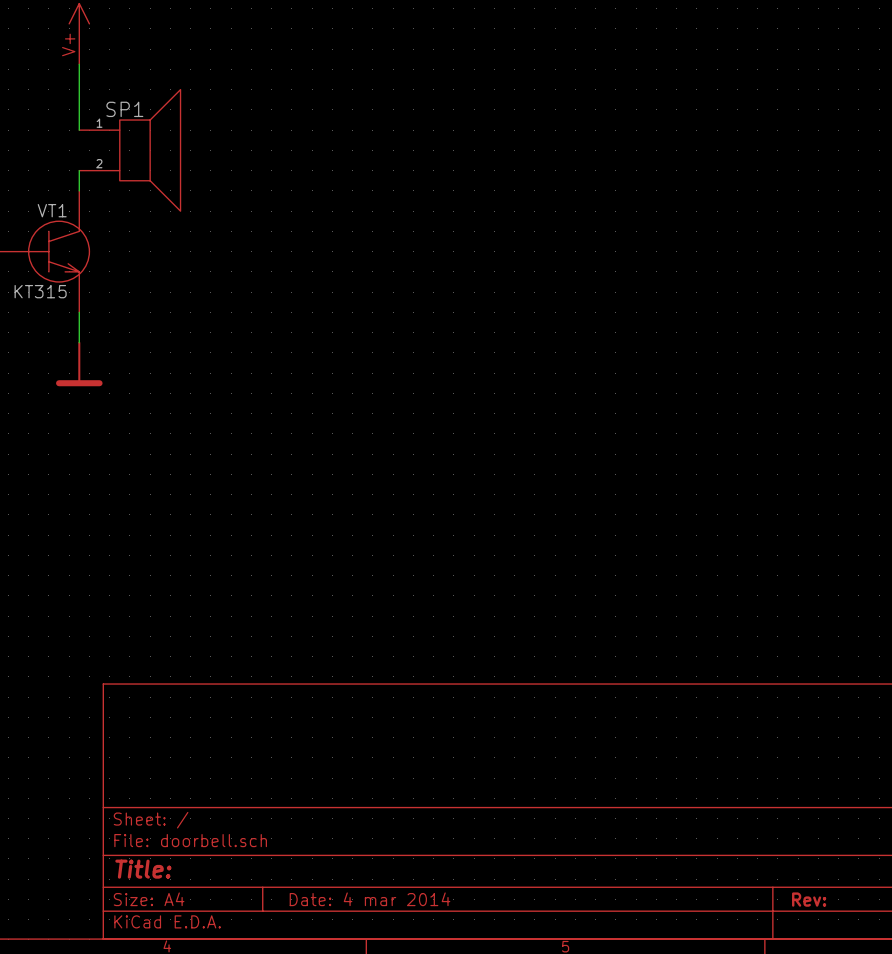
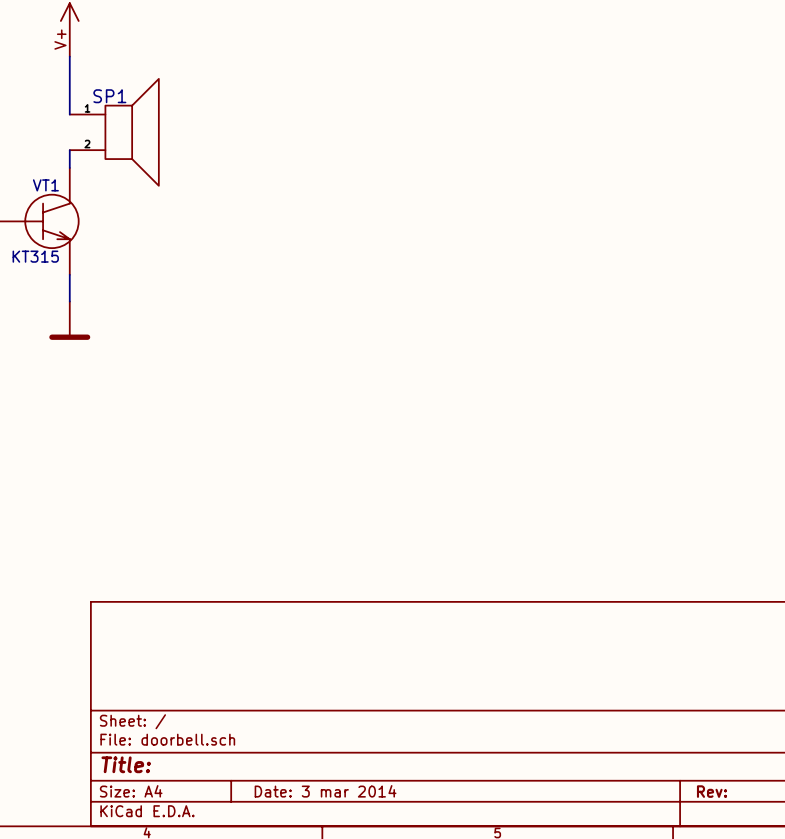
title block: Date: 4 mar 2014 (369, 899) -> Date: 3 mar 2014 (325, 791)

